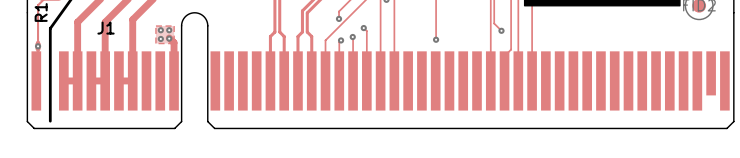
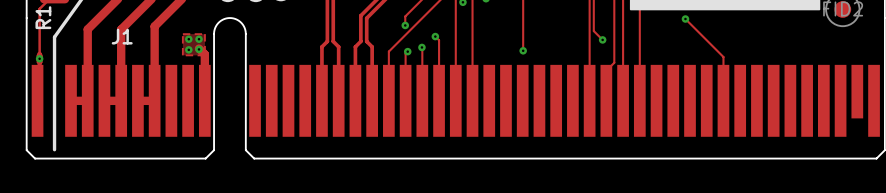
track: none -> (685, 19) (723, 57) (723, 100)
via: none -> (685, 19)

